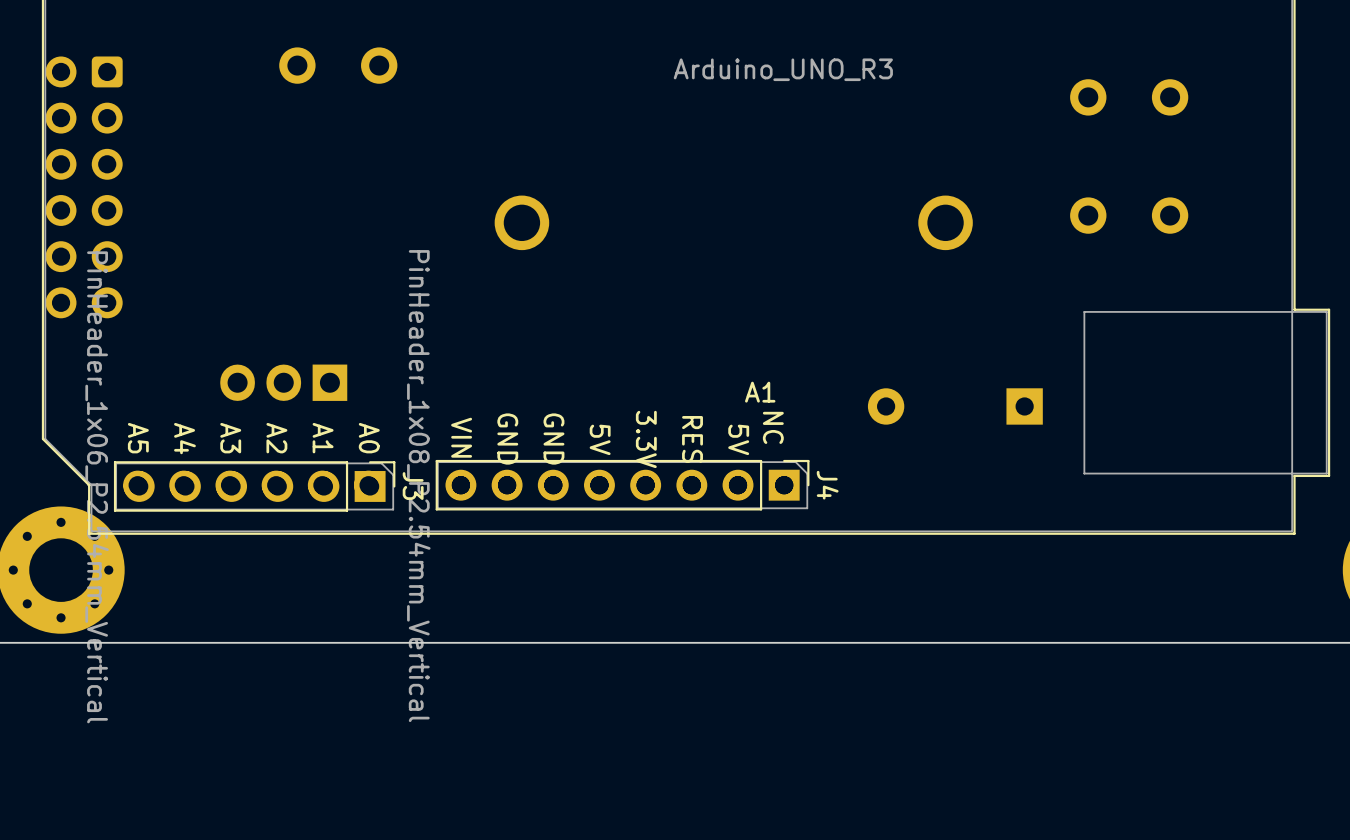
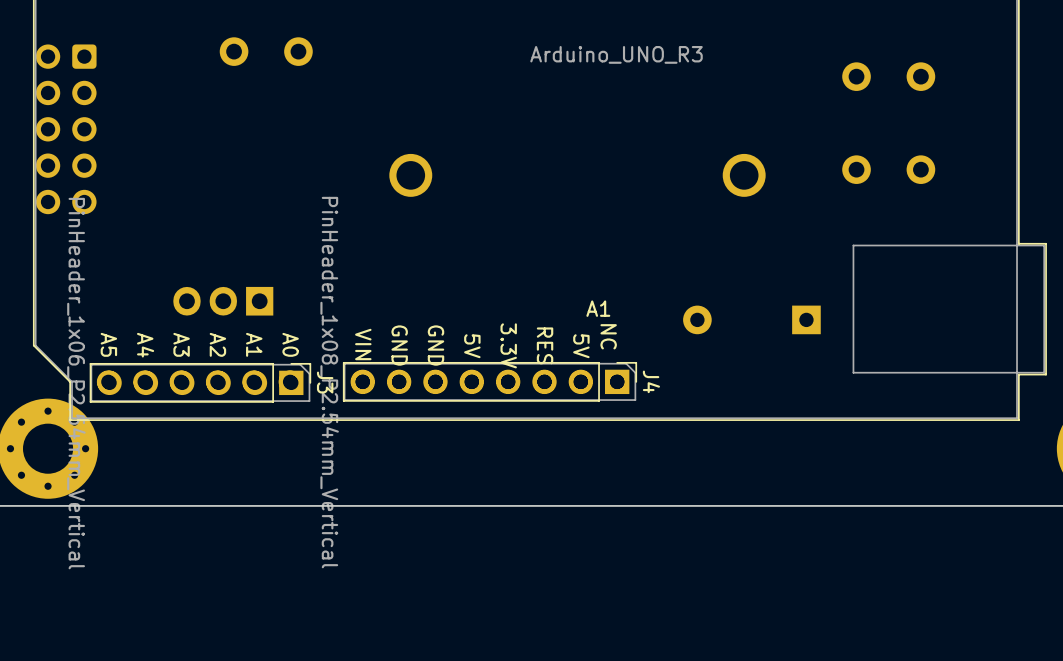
part: (84, 187) -> none

